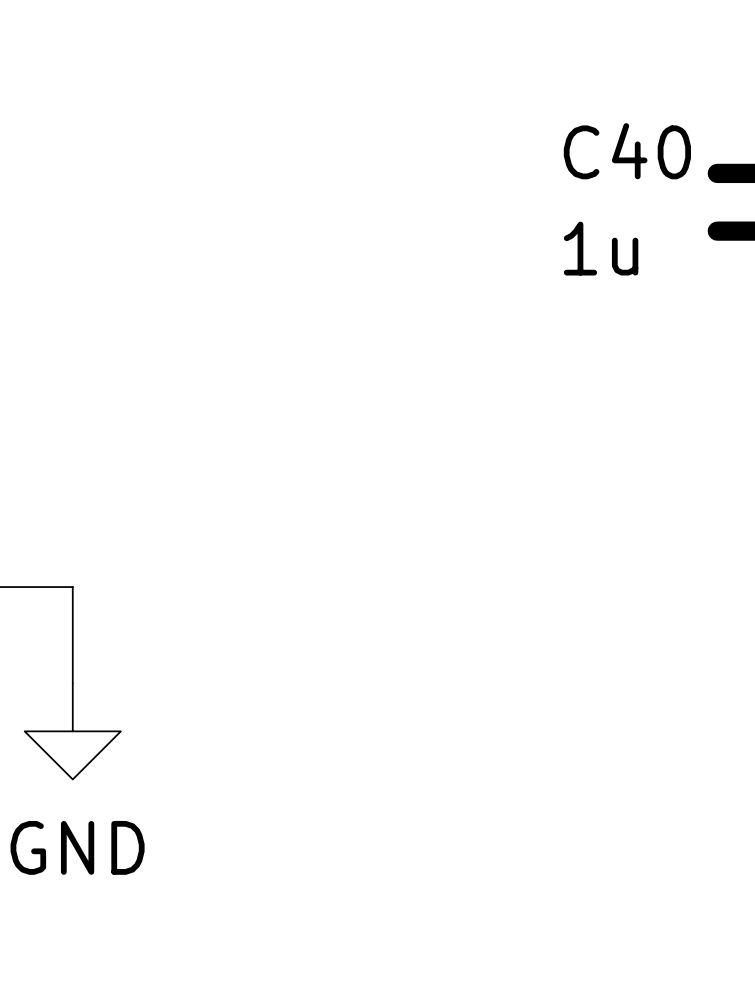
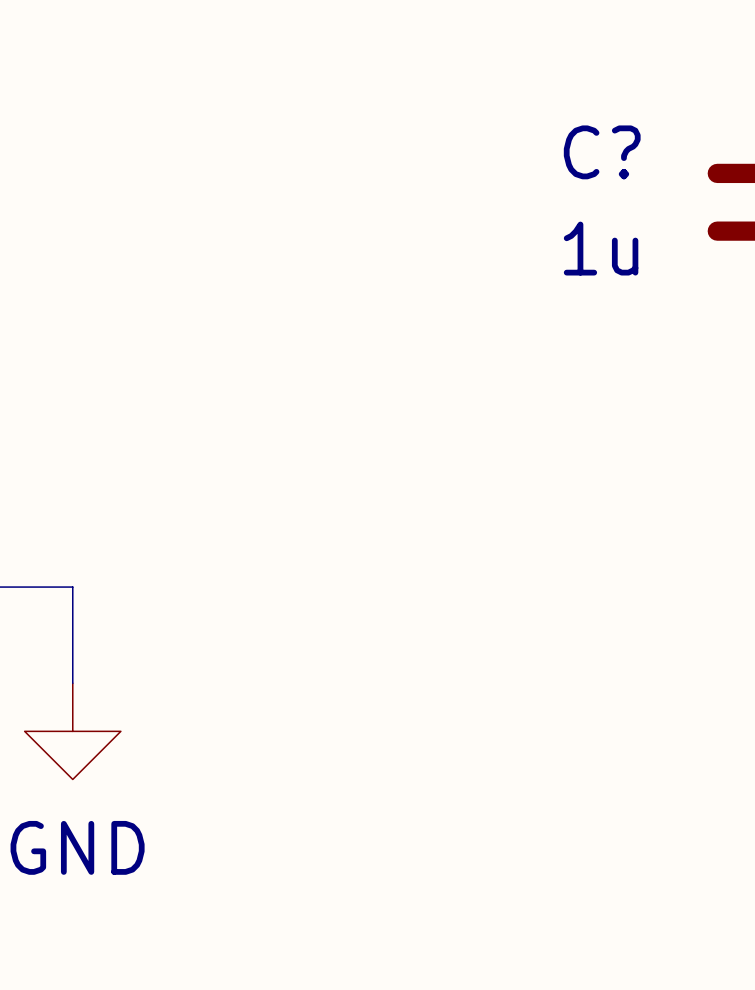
C40 name: C40 (627, 151) -> C? (602, 152)

